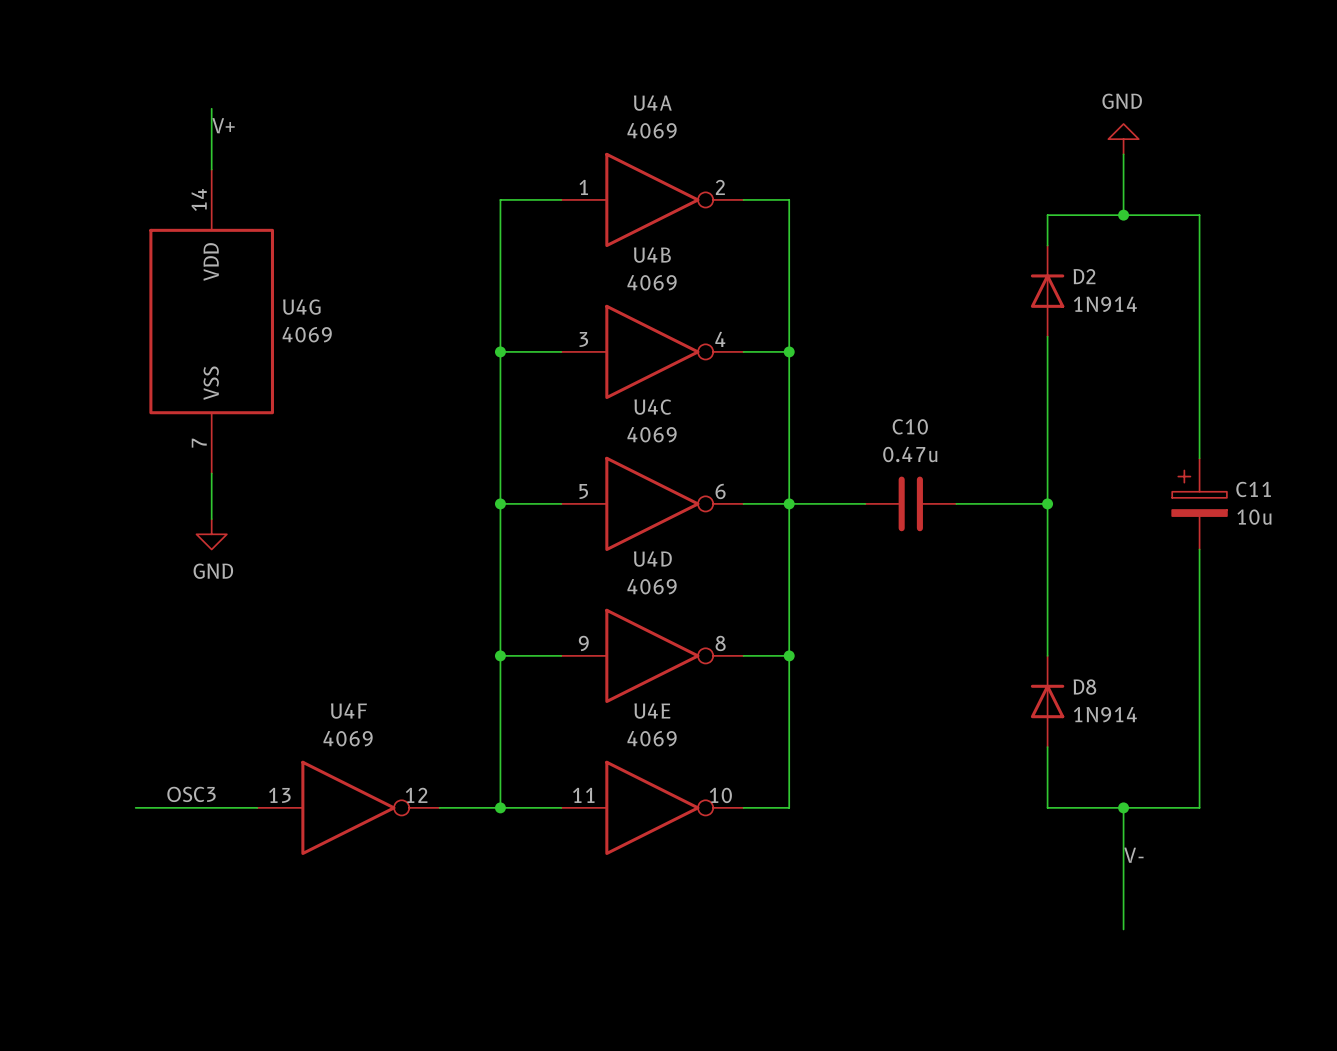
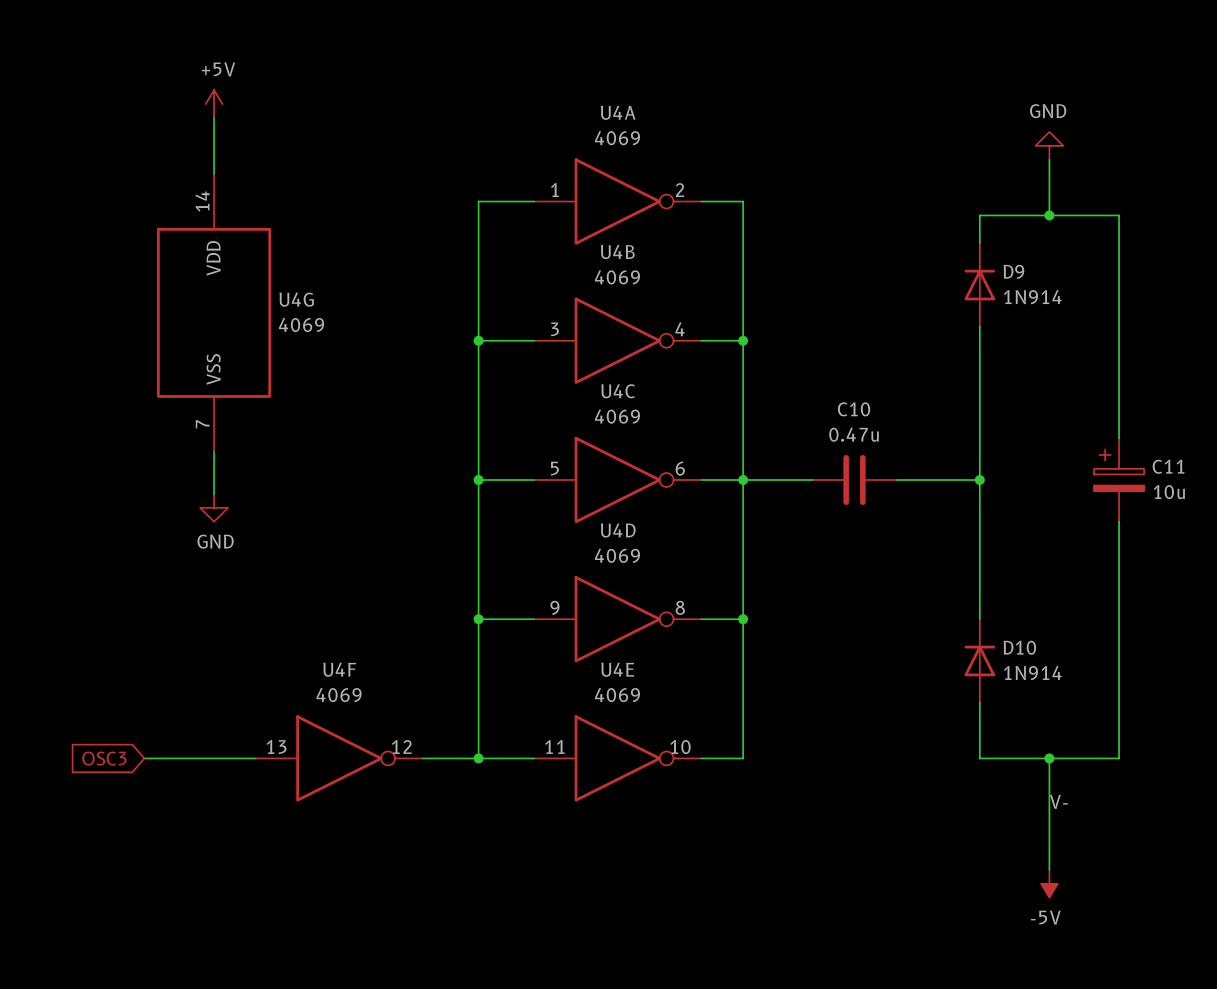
power symbol: none -> +5V (214, 104)
label: V+ (223, 125) -> none
D2 name: D2 (1084, 276) -> D9 (1013, 271)
D8 name: D8 (1084, 687) -> D10 (1019, 647)
label: OSC3 (191, 794) -> none
global label: none -> OSC3 (104, 758)
power symbol: none -> -5V (1049, 883)

